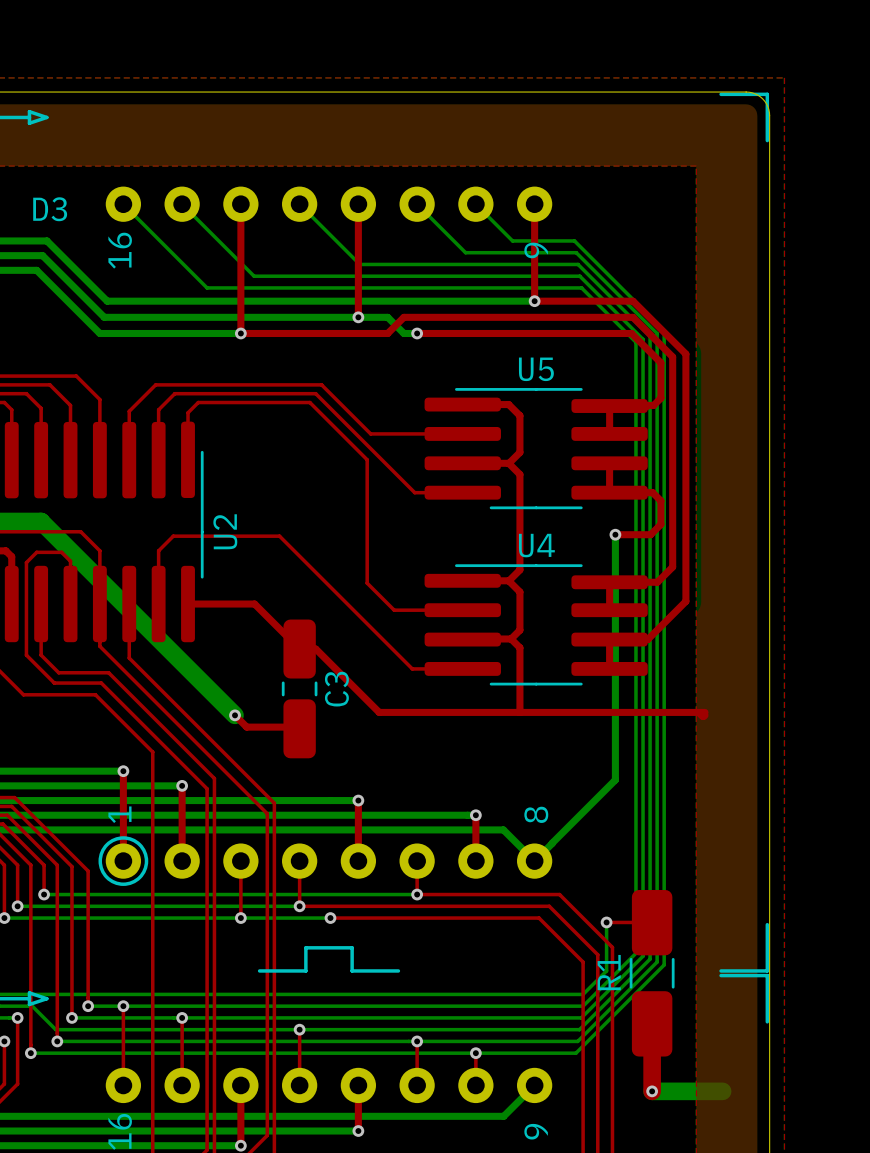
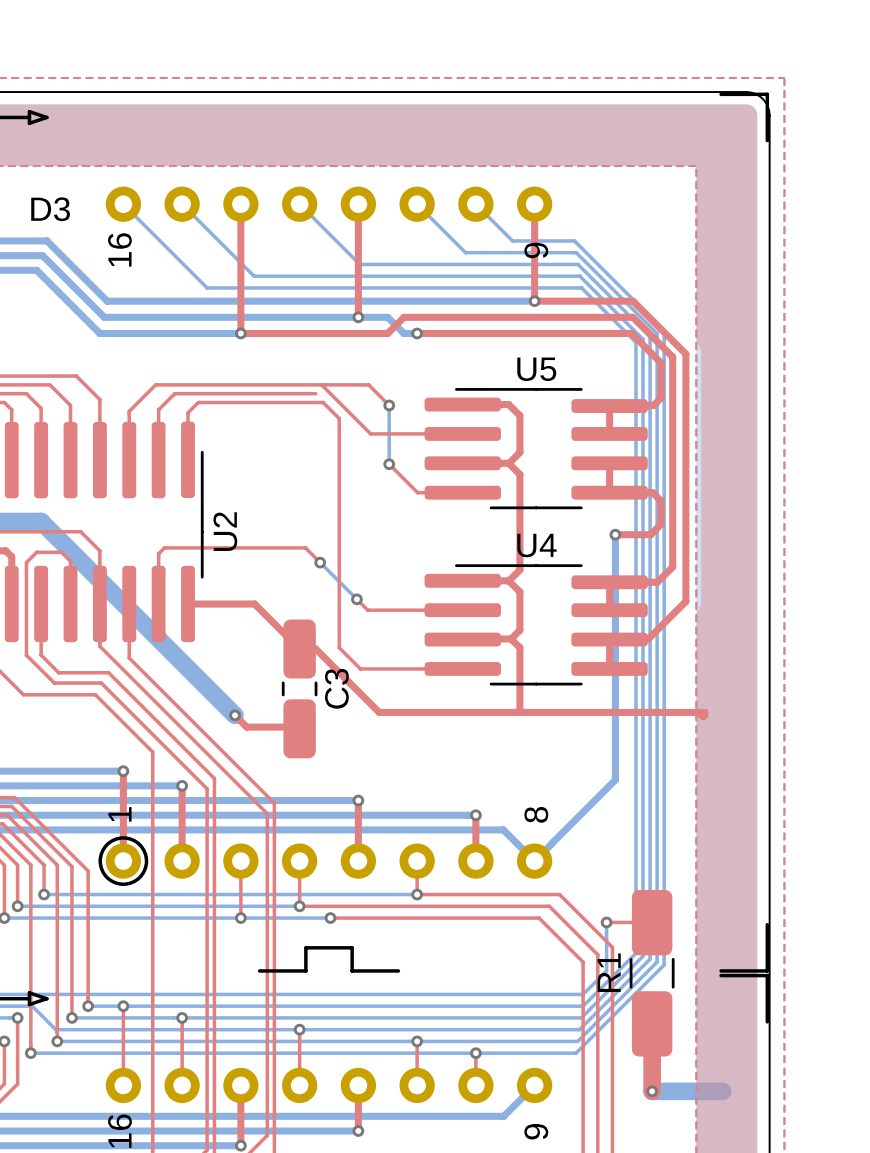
top track: none -> (321, 384) (368, 384) (389, 405)
top track: (315, 393) (414, 492) (417, 492) -> (389, 464) (417, 492)
top track: (309, 402) (367, 459) (367, 583) (394, 610) -> (309, 402) (323, 402) (339, 418) (339, 647) (360, 668) (412, 668)
bottom track: none -> (389, 405) (389, 464)
via: none -> (389, 405)
via: none -> (389, 464)
top track: (158, 553) (158, 550) (173, 536) (279, 536) (412, 668) -> (158, 553) (164, 547) (305, 547) (320, 562)
bottom track: none -> (320, 562) (356, 599)
via: none -> (320, 562)
top track: none -> (356, 599) (367, 610) (394, 610)
via: none -> (356, 599)

